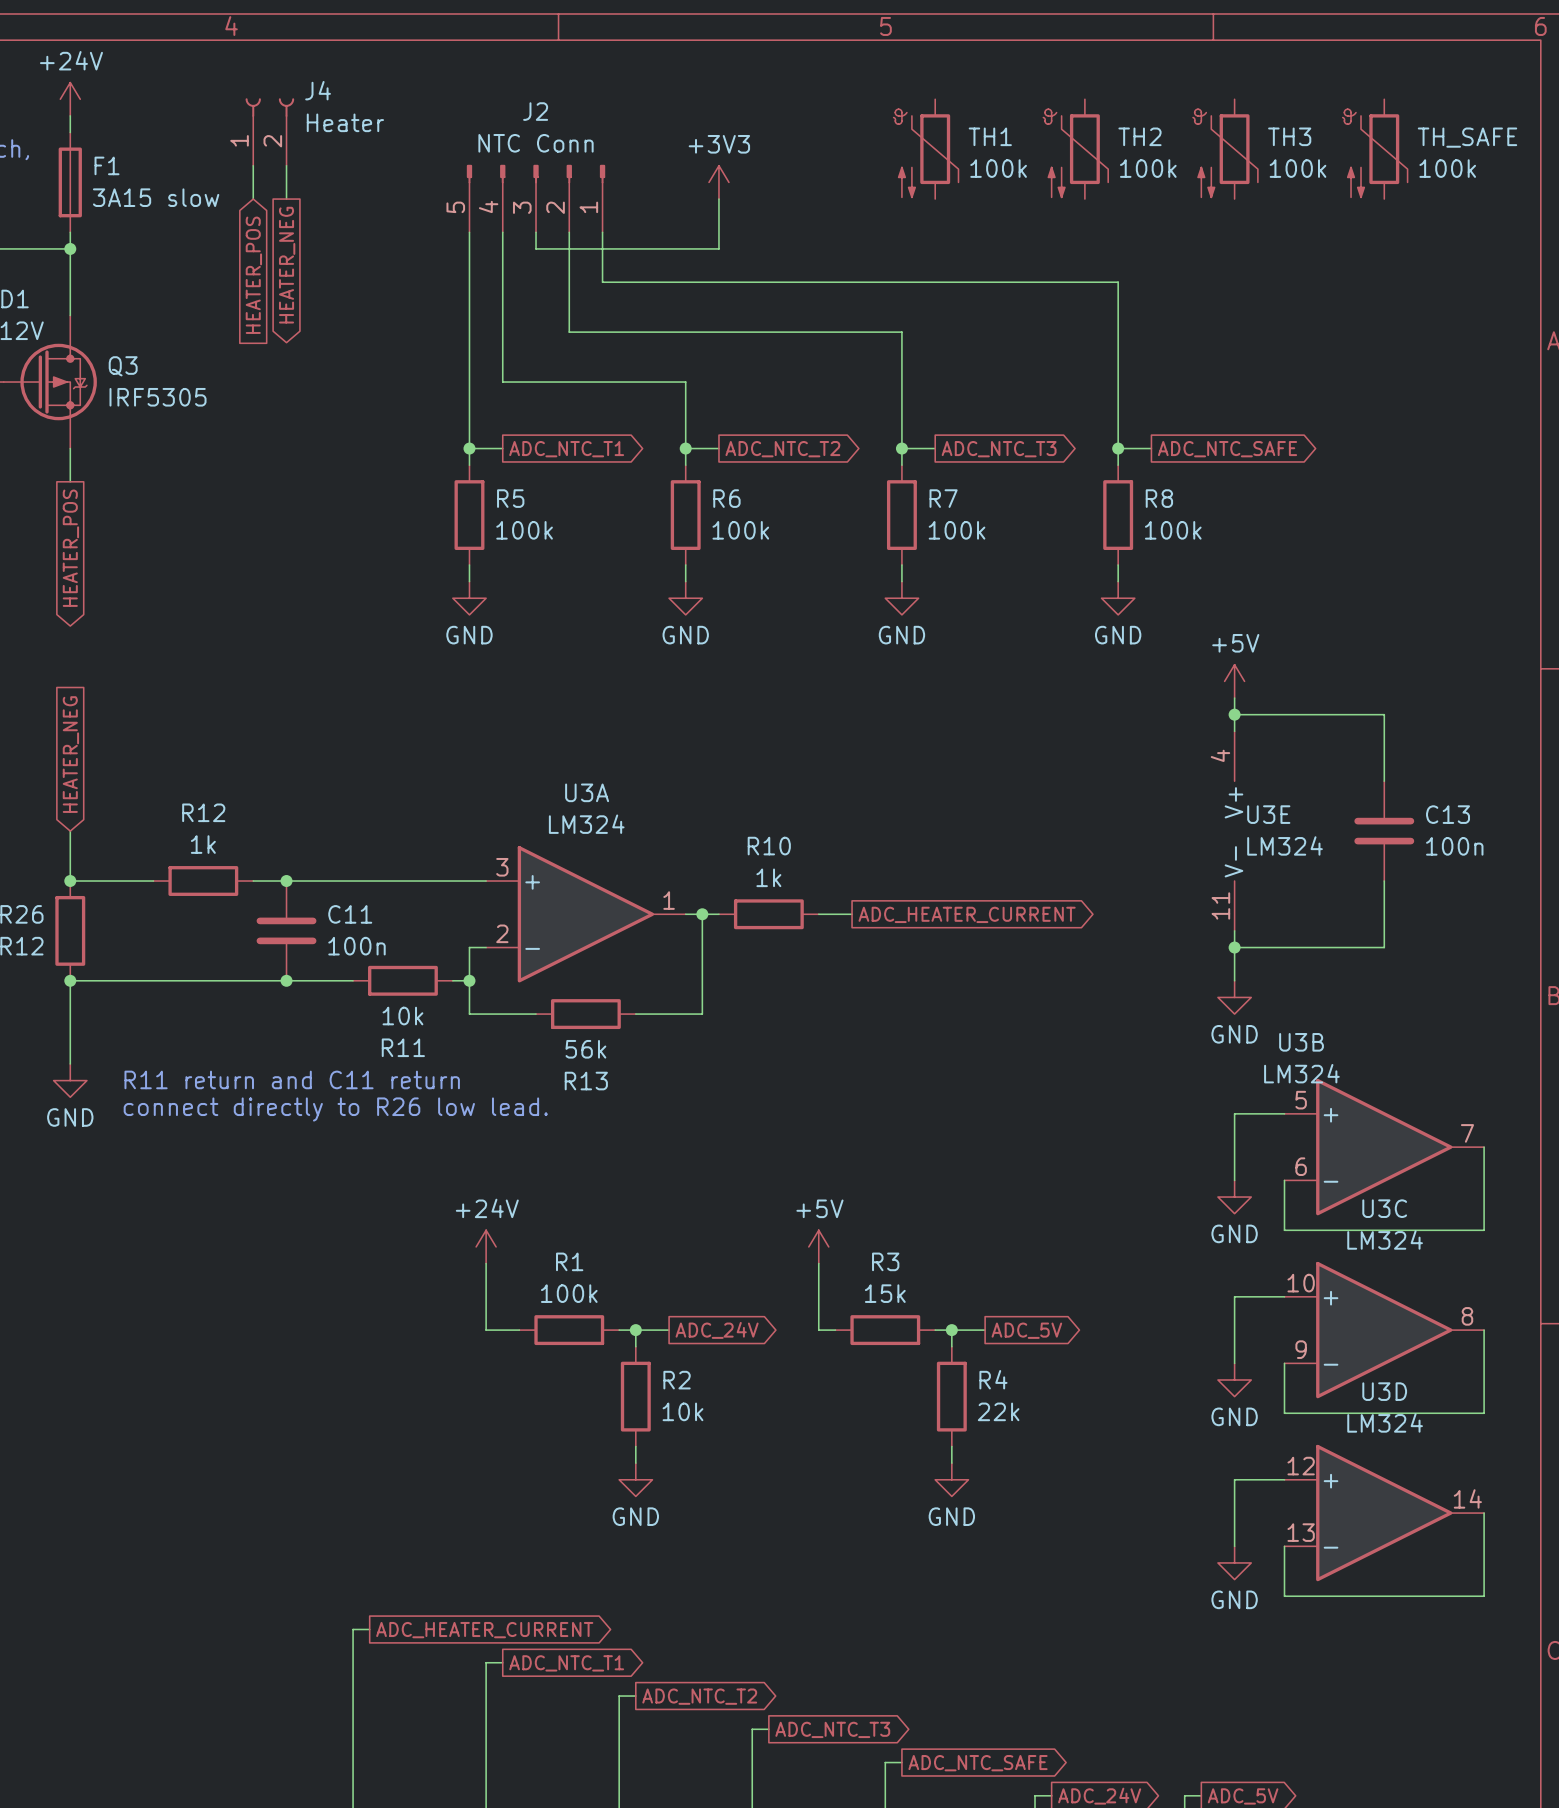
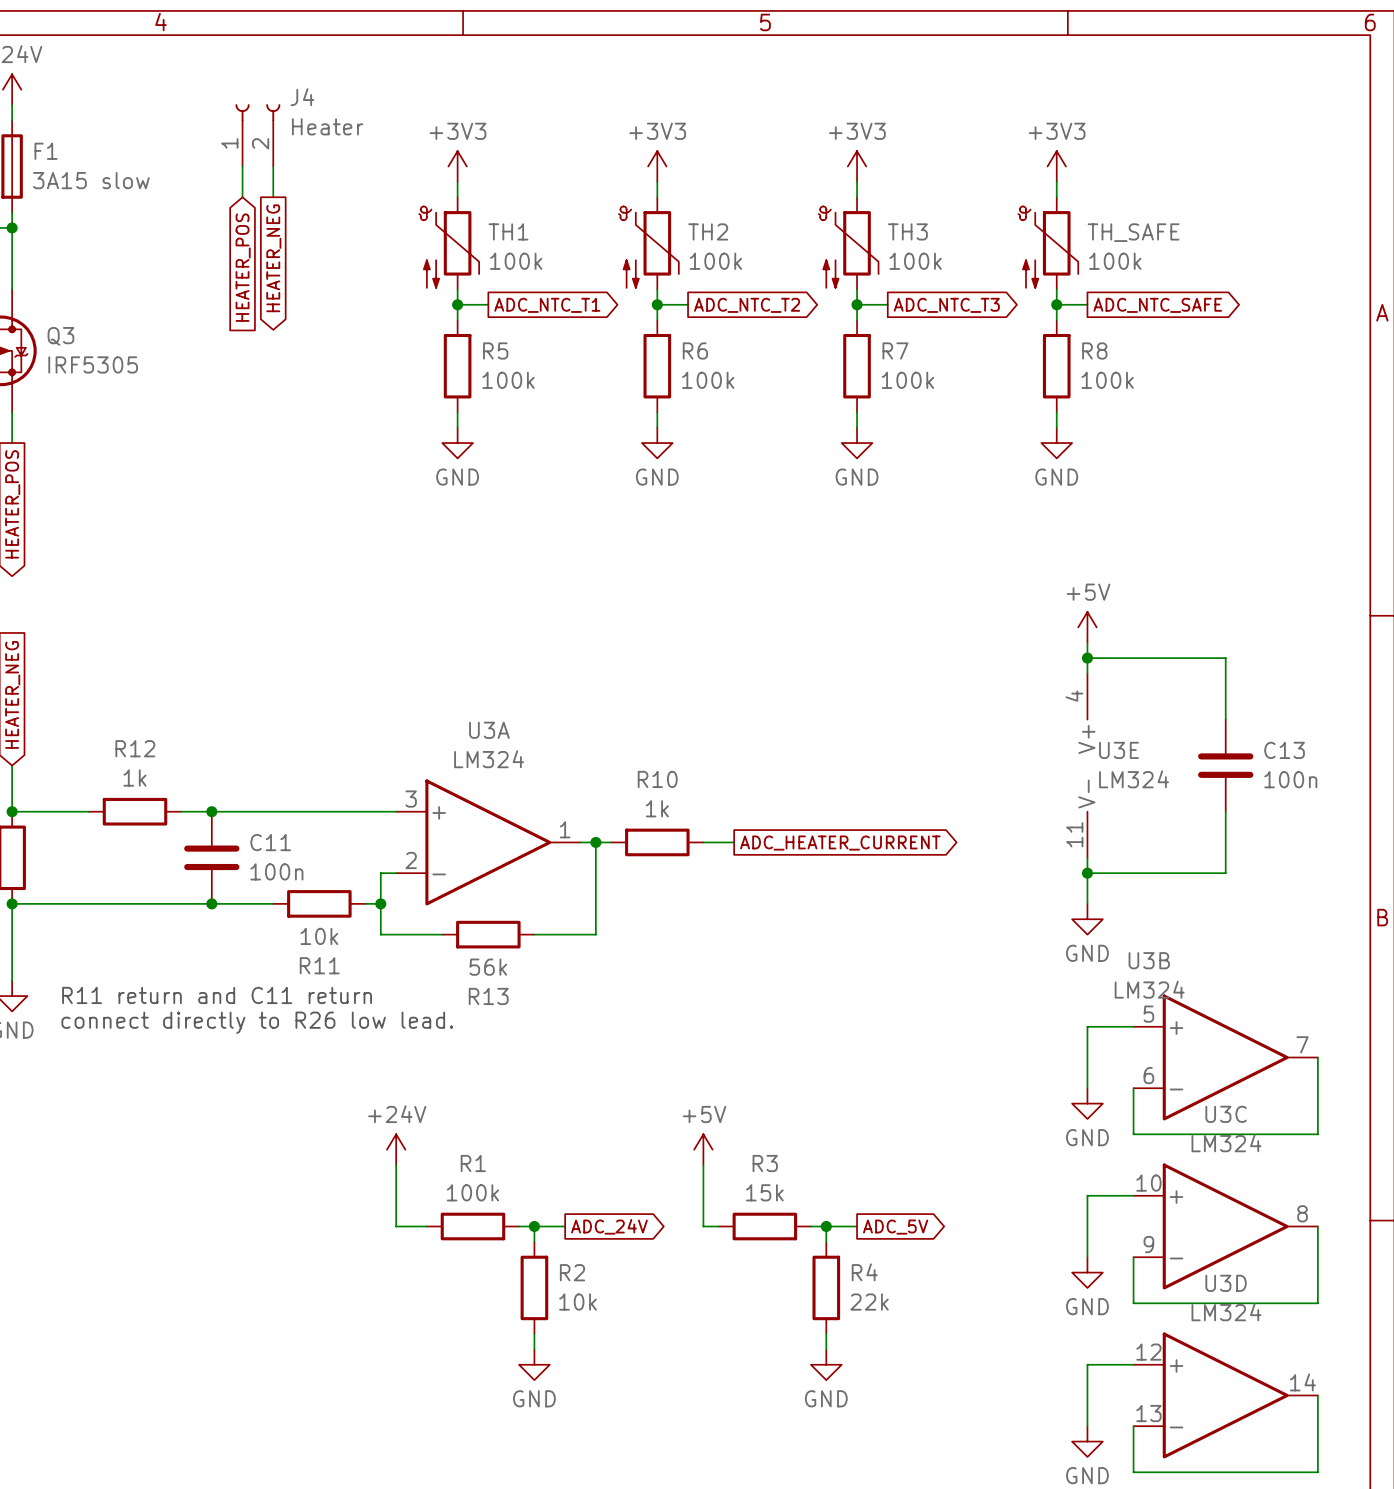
J4 position: (269, 132) -> (257, 135)
TH1 position: (926, 149) -> (449, 243)
TH2 position: (1075, 149) -> (648, 243)
TH3 position: (1225, 149) -> (848, 243)
TH_SAFE position: (1375, 149) -> (1048, 243)
wire: (253, 165) (253, 199) -> (242, 166) (242, 197)
wire: (286, 165) (286, 199) -> (273, 166) (273, 197)
power symbol: none -> +3V3 (457, 166)
power symbol position: +3V3 (718, 182) -> +3V3 (657, 166)
power symbol: none -> +3V3 (857, 166)
power symbol: none -> +3V3 (1056, 166)
J2: NTC Conn (536, 198) -> none
wire: none -> (457, 181) (457, 197)
wire: (718, 199) (718, 248) (536, 248) (536, 232) -> none
wire: none -> (657, 181) (657, 197)
wire: none -> (857, 181) (857, 197)
wire: none -> (1056, 181) (1056, 197)
wire: (469, 232) (469, 465) -> none
wire: (502, 232) (502, 382) (685, 382) (685, 465) -> none
wire: (569, 232) (569, 332) -> (457, 304) (472, 304)
wire: (602, 232) (602, 282) (1118, 282) (1118, 465) -> none
global label position: HEATER_NEG (287, 265) -> HEATER_NEG (273, 258)
global label position: HEATER_POS (253, 275) -> HEATER_POS (243, 267)
wire: none -> (457, 289) (457, 320)
wire: none -> (657, 289) (657, 320)
wire: none -> (857, 289) (857, 320)
wire: none -> (1056, 289) (1056, 320)
junction: none -> (457, 304)
wire: (585, 332) (768, 332) -> none
junction: none -> (657, 304)
wire: (802, 332) (901, 332) (901, 465) -> none
junction: none -> (857, 304)
junction: none -> (1056, 304)
wire: (469, 448) (502, 448) -> none
junction: (469, 448) -> none
wire: (685, 448) (718, 448) -> none
junction: (685, 448) -> none
wire: (901, 448) (935, 448) -> (857, 304) (887, 304)
junction: (901, 448) -> none
wire: (1118, 448) (1151, 448) -> (1056, 304) (1087, 304)
junction: (1118, 448) -> none
global label position: ADC_NTC_T1 (566, 449) -> ADC_NTC_T1 (547, 305)
global label position: ADC_NTC_T2 (782, 449) -> ADC_NTC_T2 (747, 305)
global label position: ADC_NTC_T3 (999, 449) -> ADC_NTC_T3 (946, 305)
global label position: ADC_NTC_SAFE (1227, 449) -> ADC_NTC_SAFE (1157, 305)
power symbol: none -> GND (457, 443)
power symbol: none -> GND (657, 443)
power symbol: none -> GND (857, 443)
power symbol: none -> GND (1056, 443)
R5 position: (469, 515) -> (457, 366)
R6 position: (685, 515) -> (657, 366)
R7 position: (901, 515) -> (857, 366)
R8 position: (1118, 515) -> (1056, 366)
wire: (469, 564) (469, 581) -> (457, 412) (457, 427)
wire: (685, 564) (685, 581) -> (657, 412) (657, 427)
wire: (901, 564) (901, 581) -> (857, 412) (857, 427)
wire: (1118, 564) (1118, 581) -> (1056, 412) (1056, 427)
power symbol: GND (469, 598) -> none
power symbol: GND (685, 598) -> none
power symbol: GND (901, 598) -> none
power symbol: GND (1118, 598) -> none

